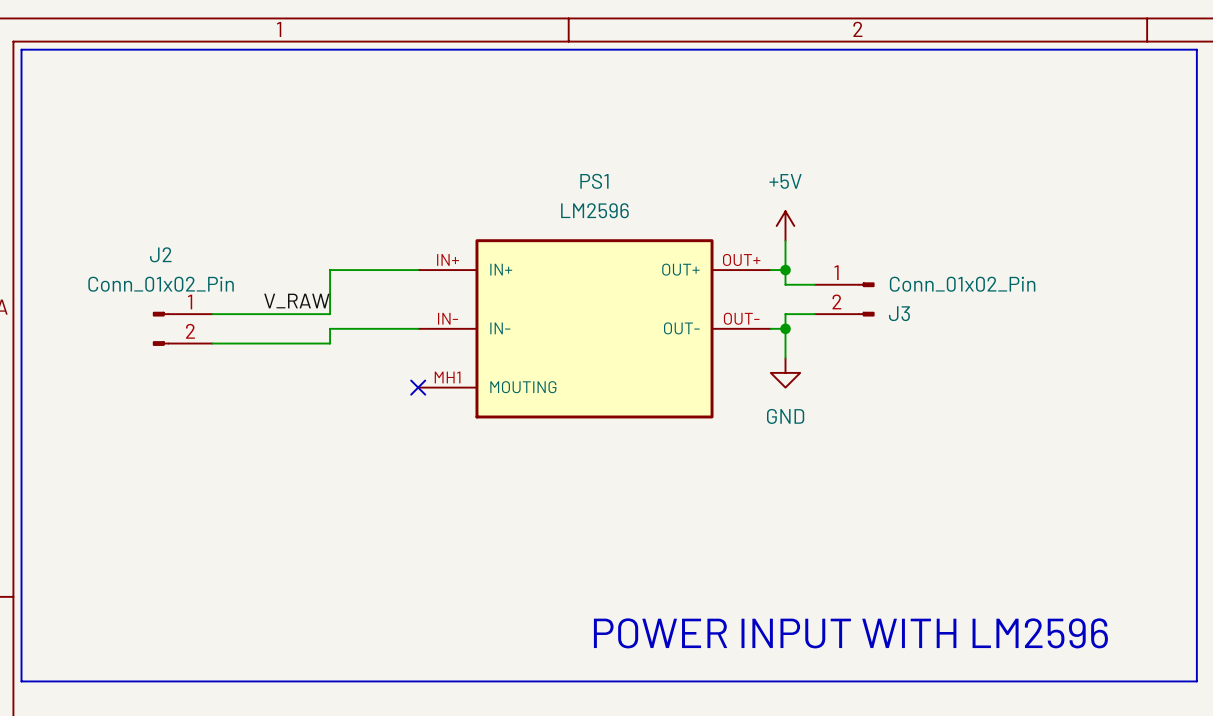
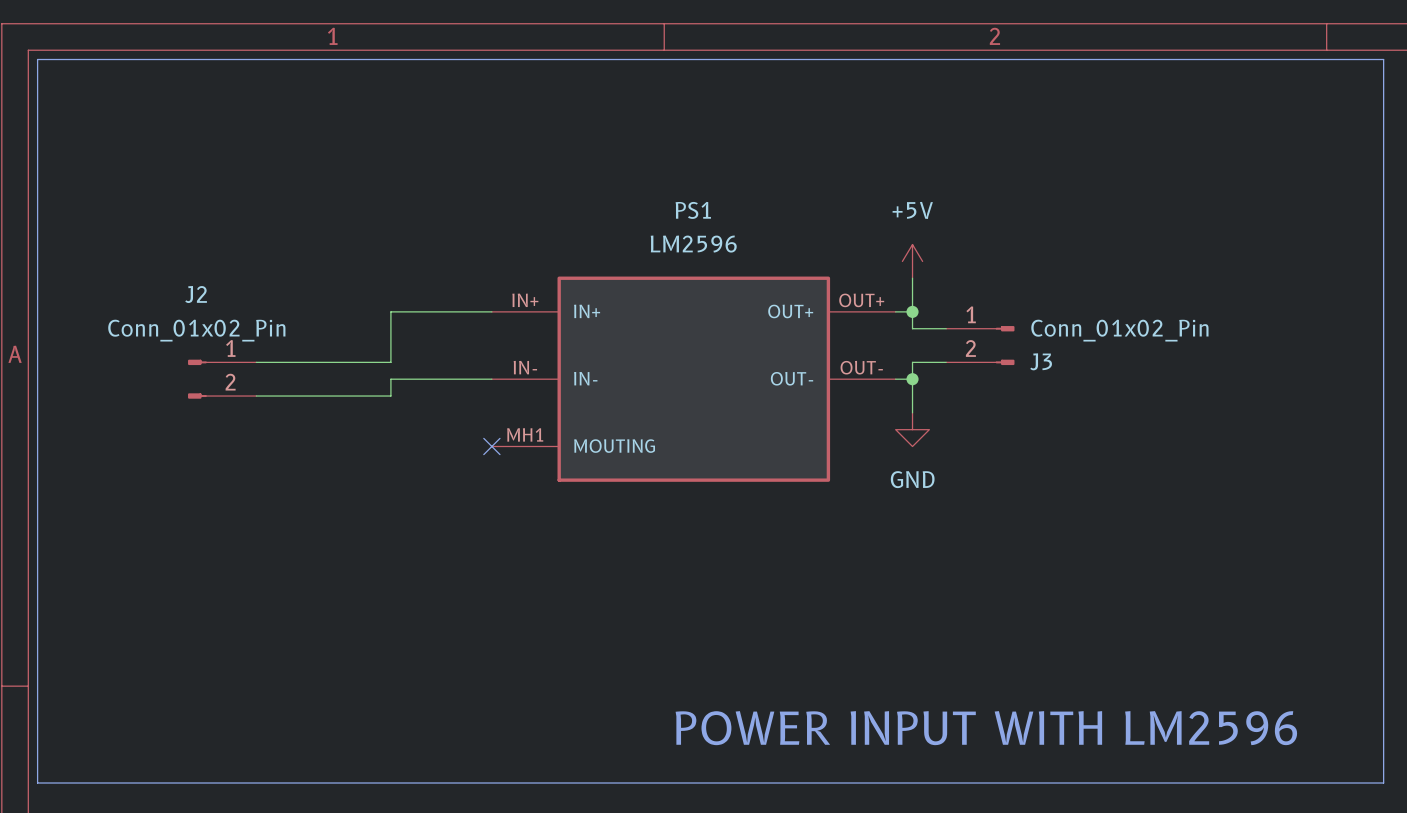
label: V_RAW (296, 301) -> none

